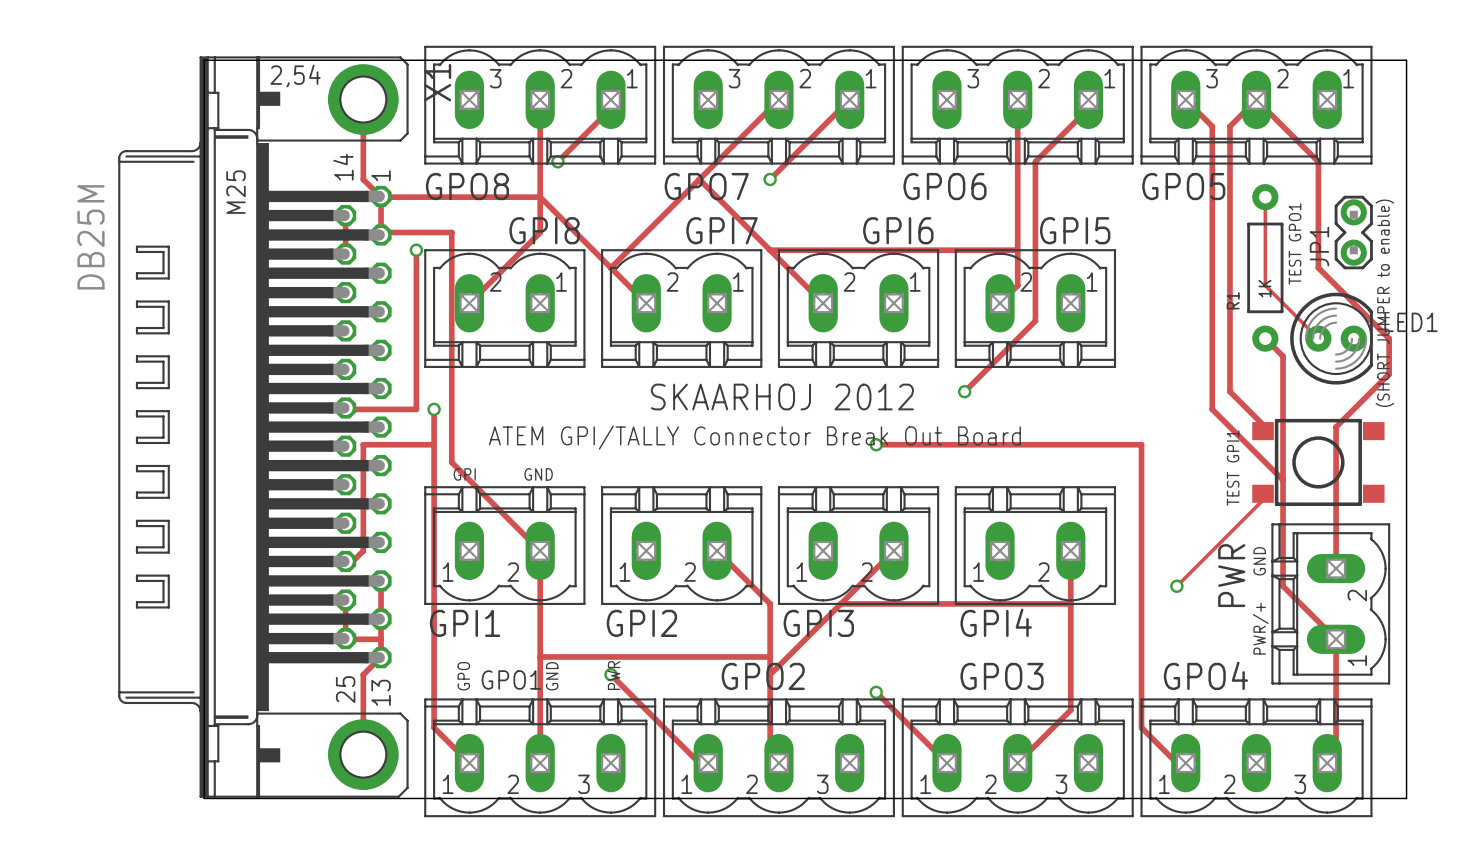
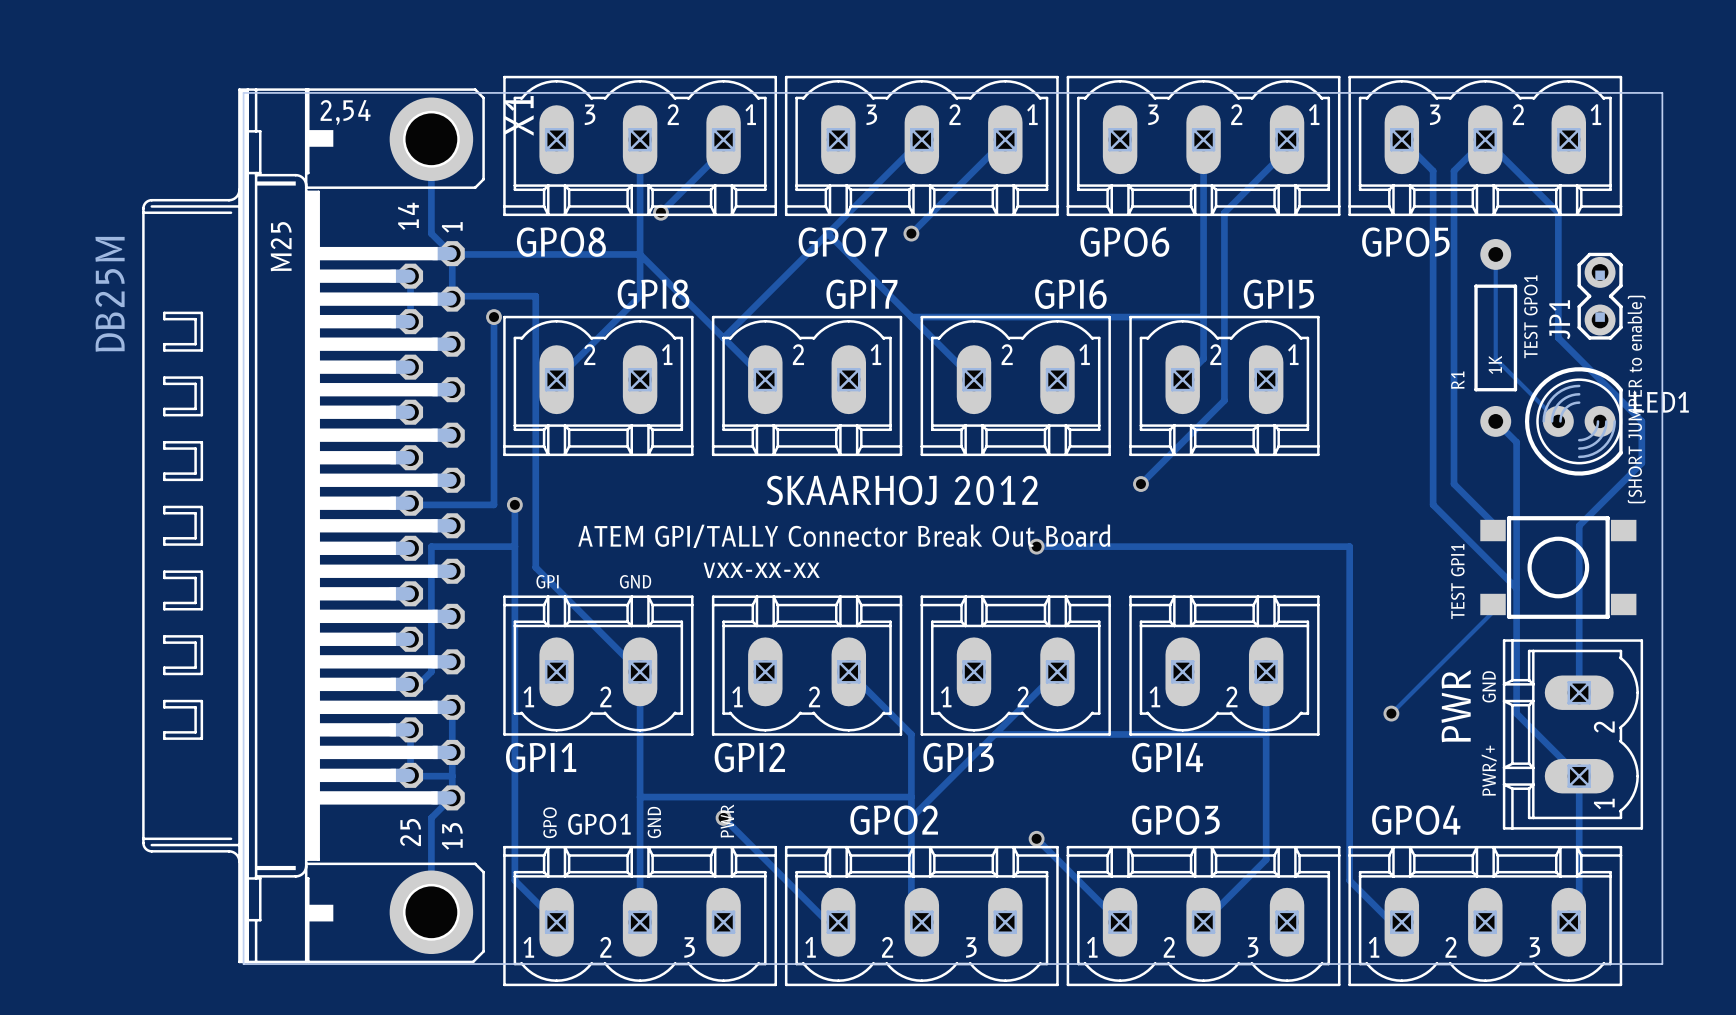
text: none -> vxx-xx-xx (761, 570)

